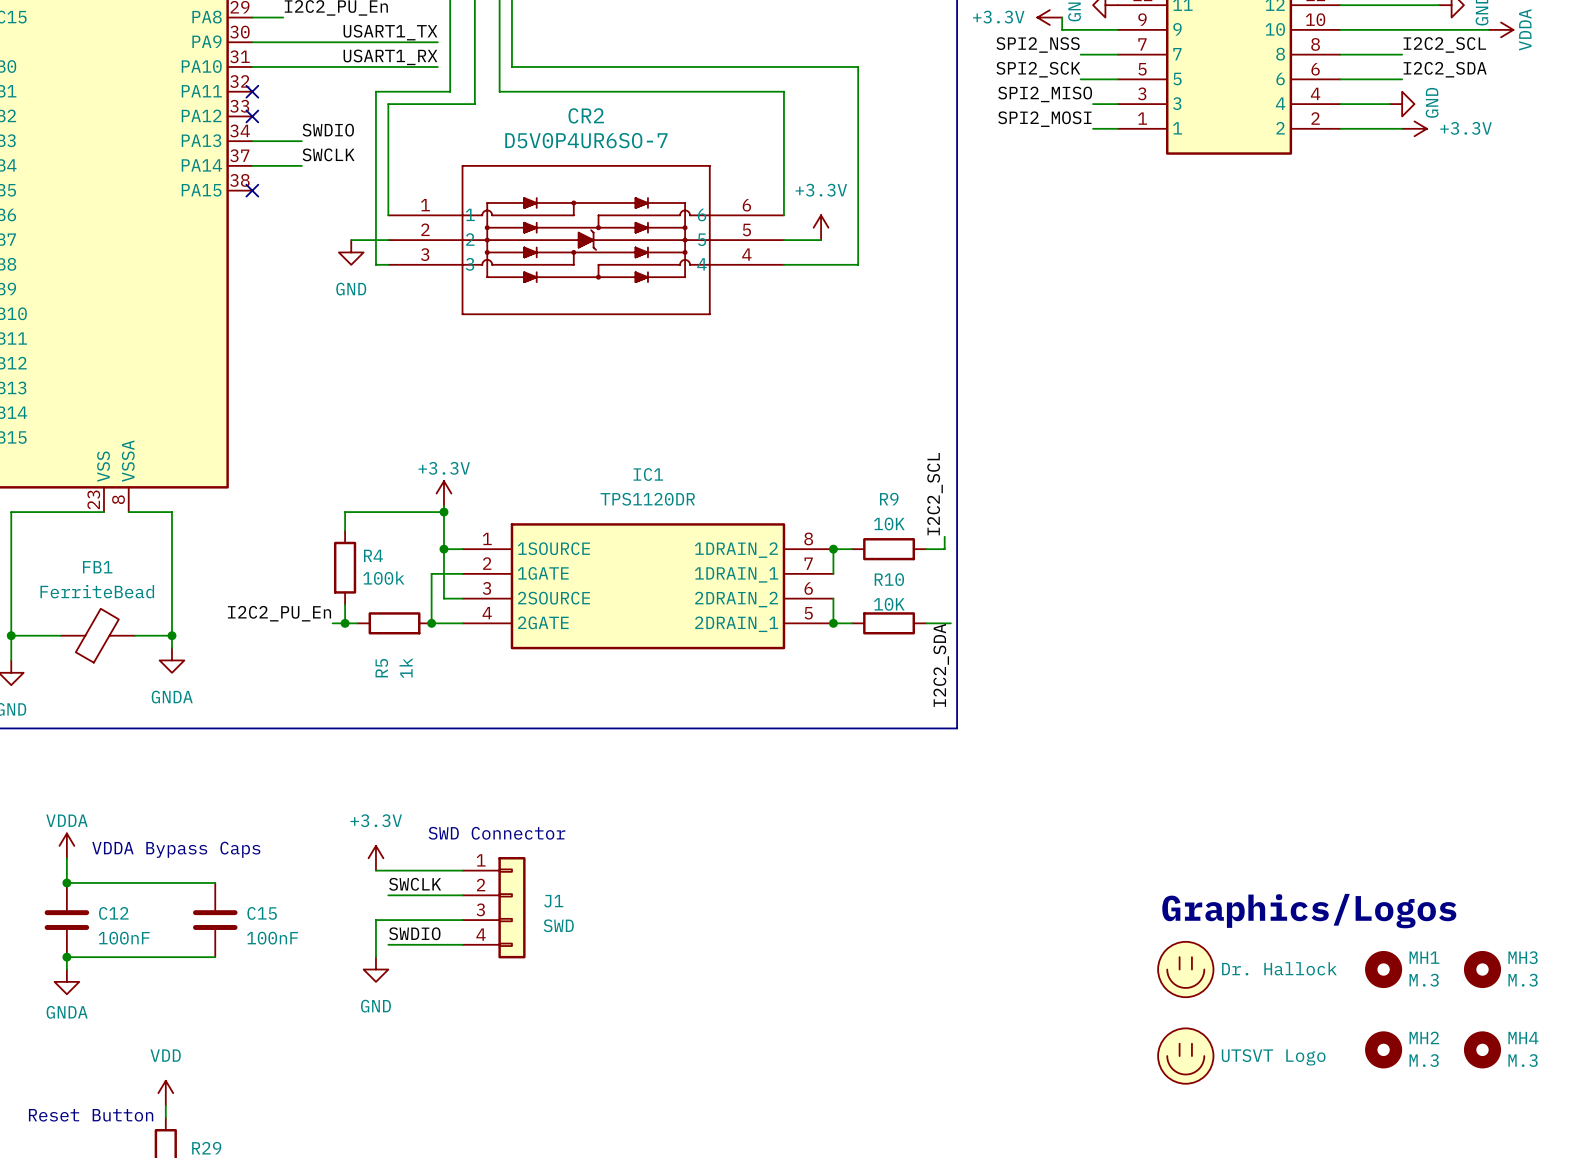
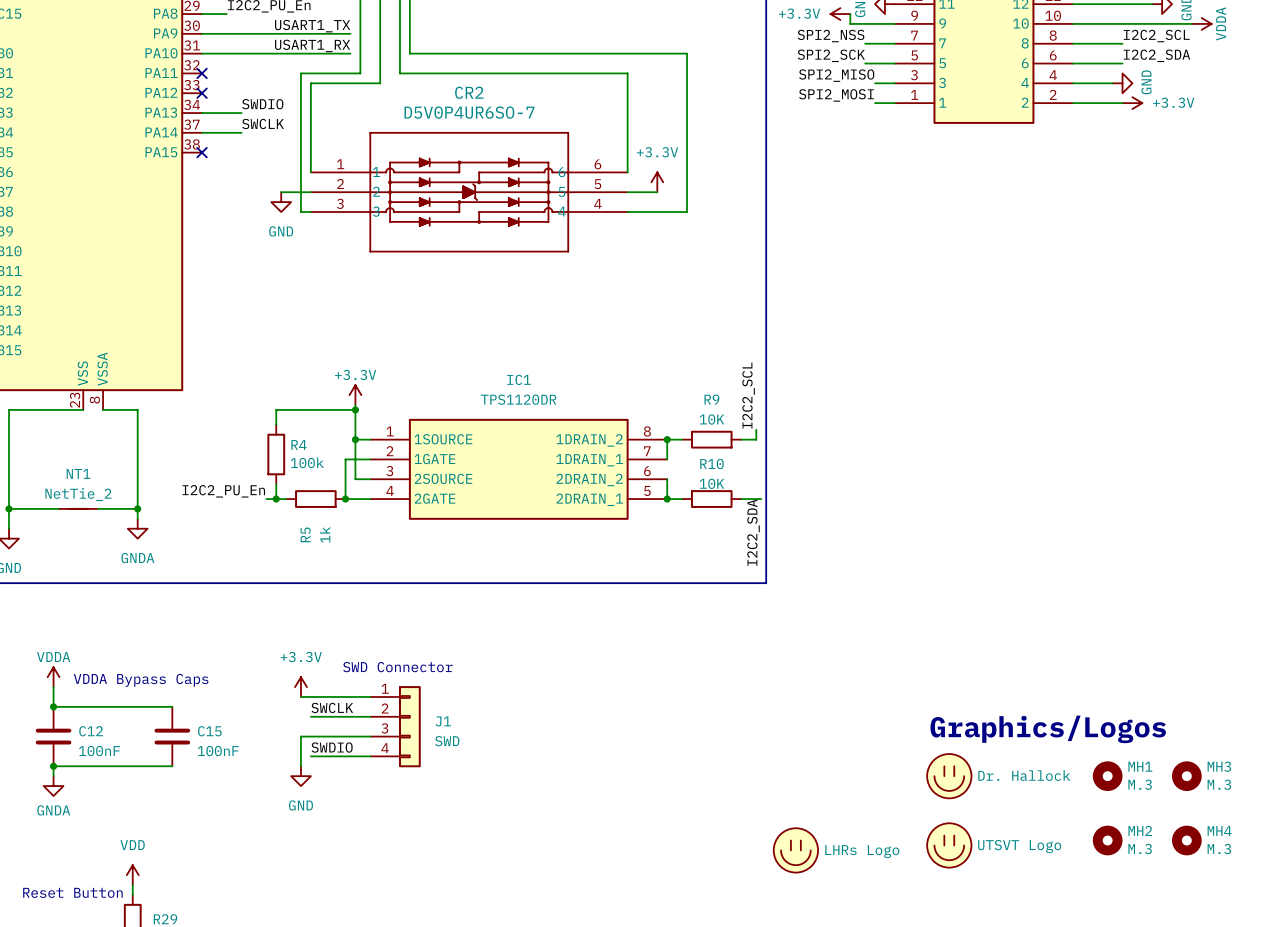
FB1: FerriteBead (97, 635) -> none
NT1: none -> NetTie_2 (78, 508)
part: none -> LHRs Logo (795, 850)

